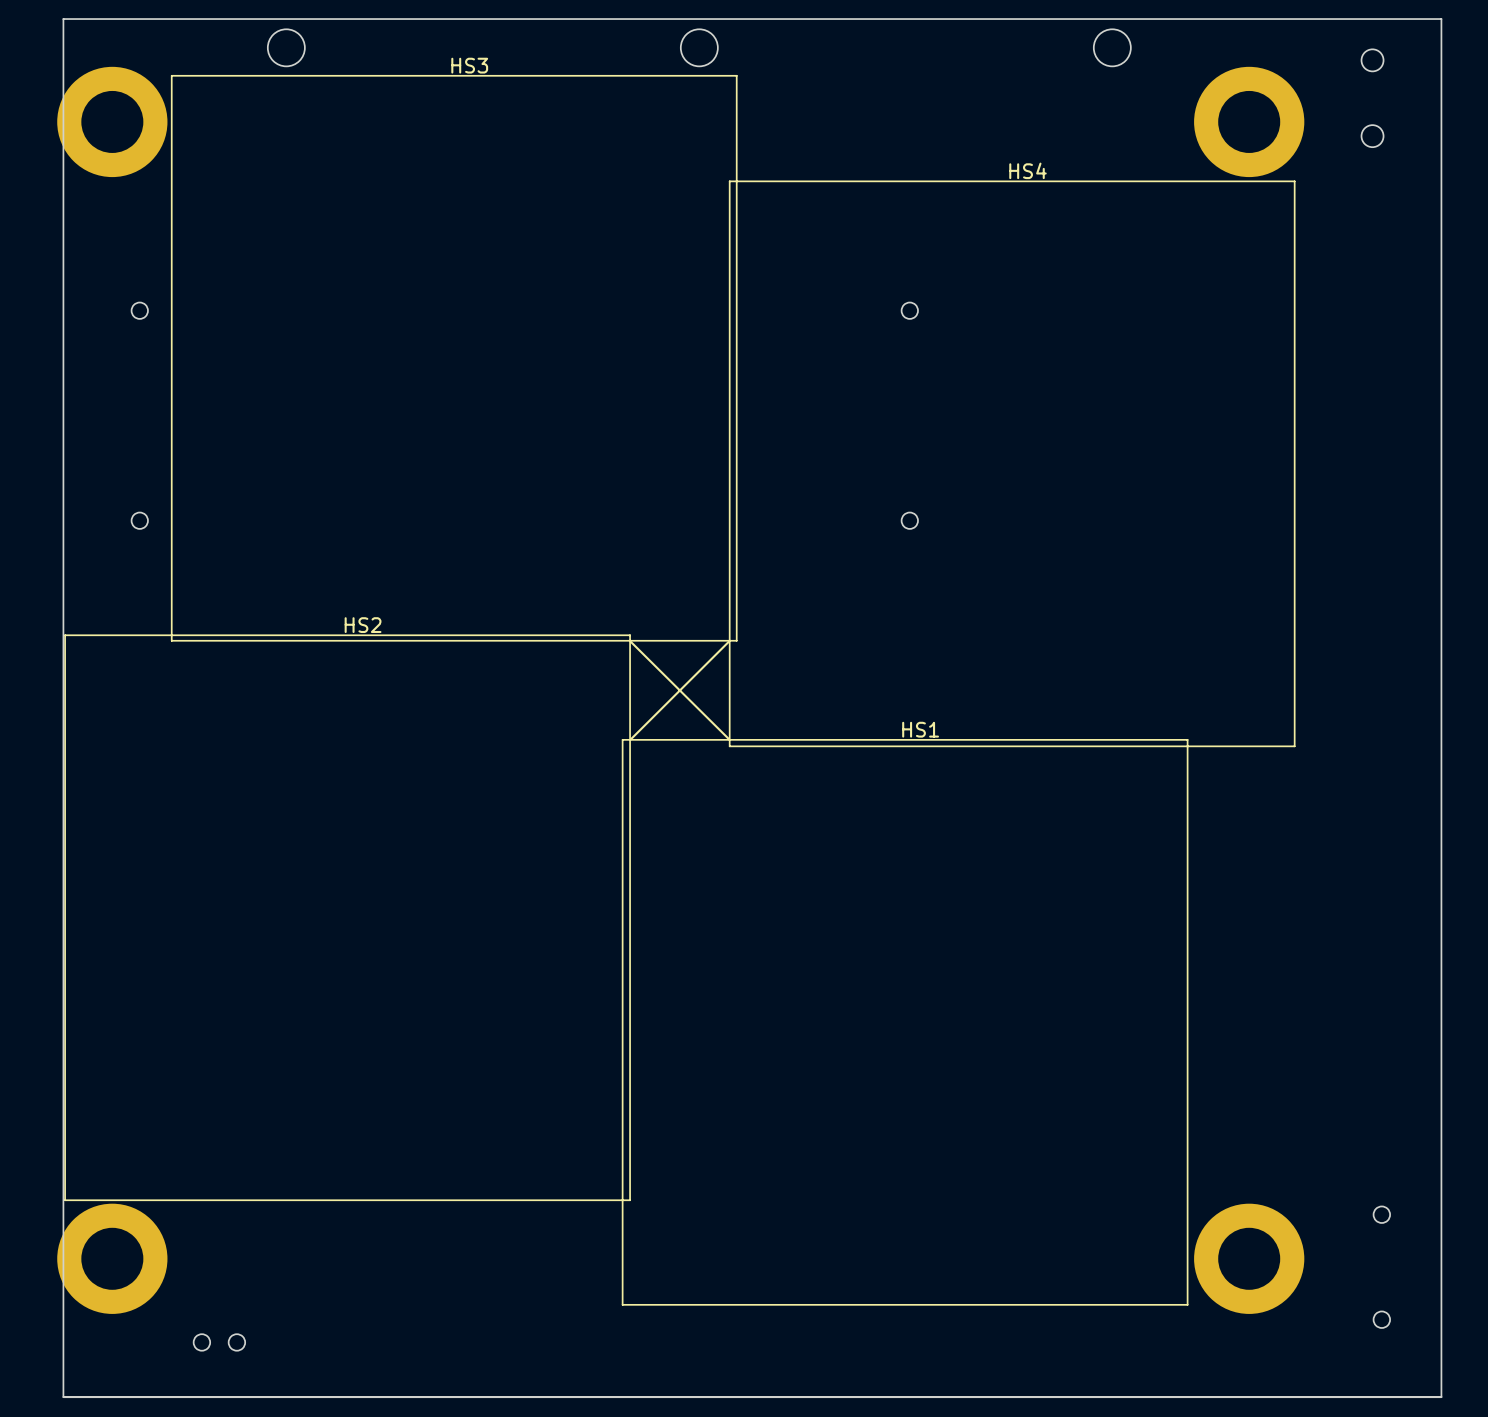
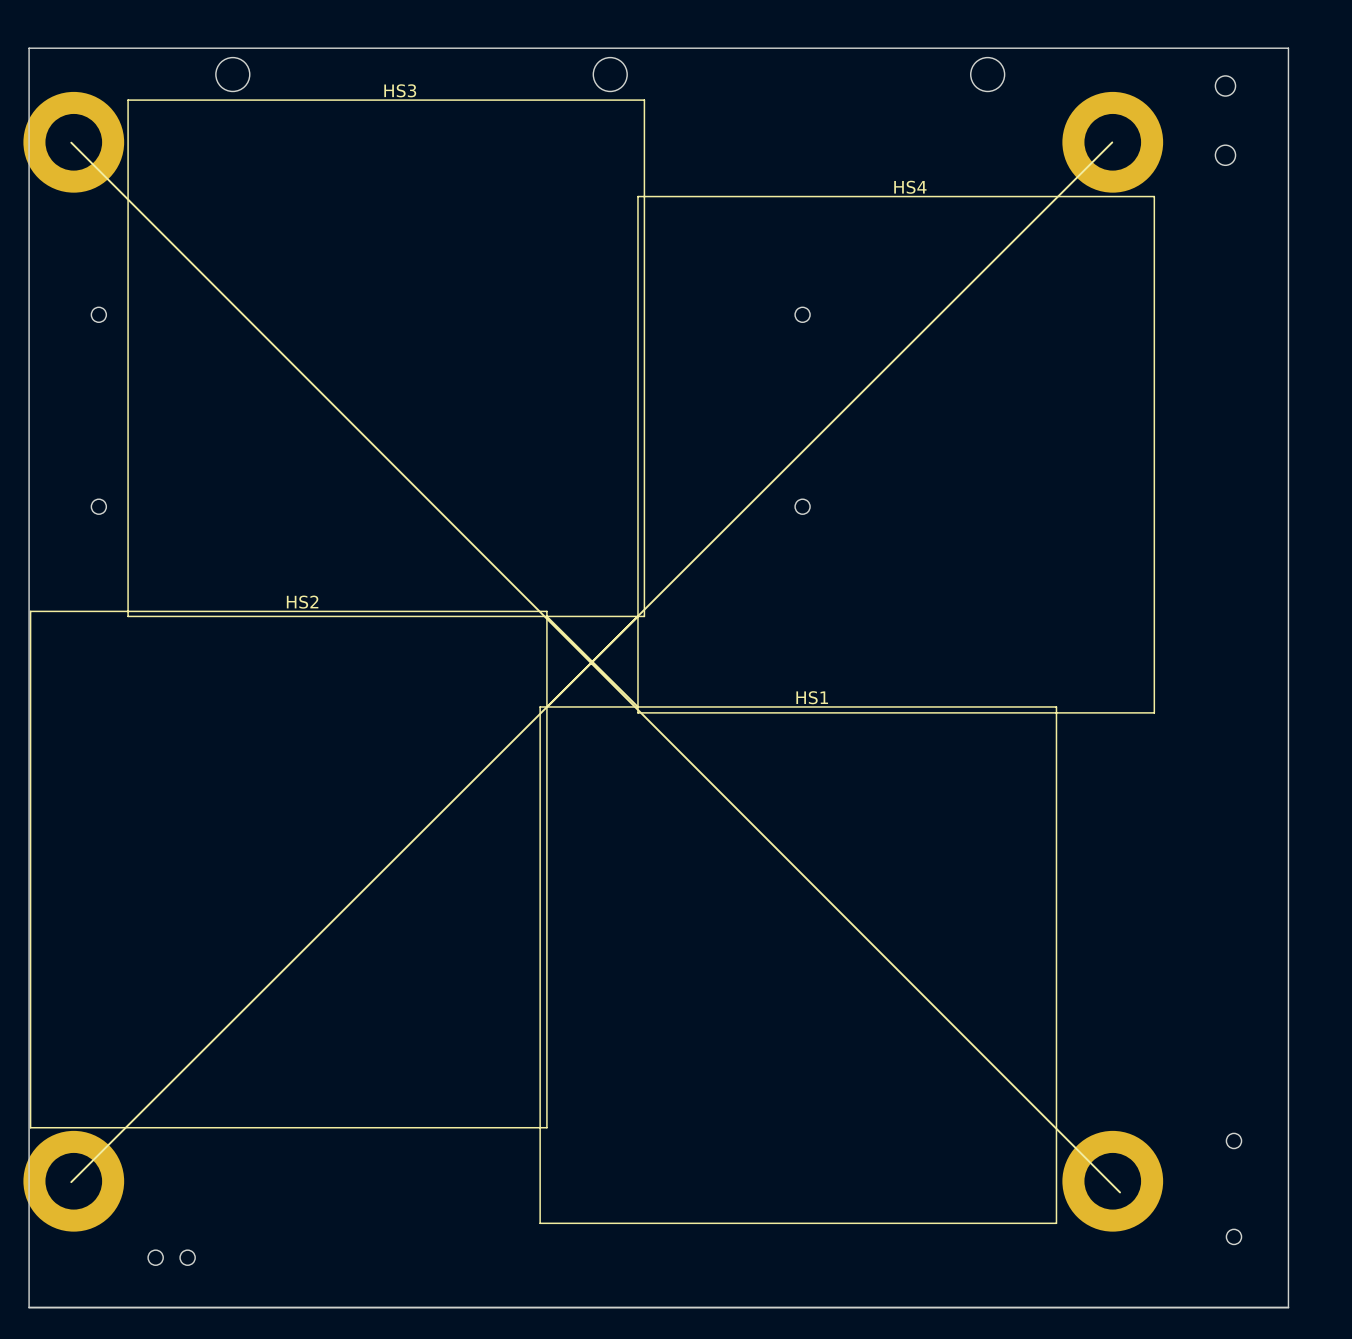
line: none -> (71, 142) (1120, 1192)
line: none -> (1112, 142) (71, 1182)

